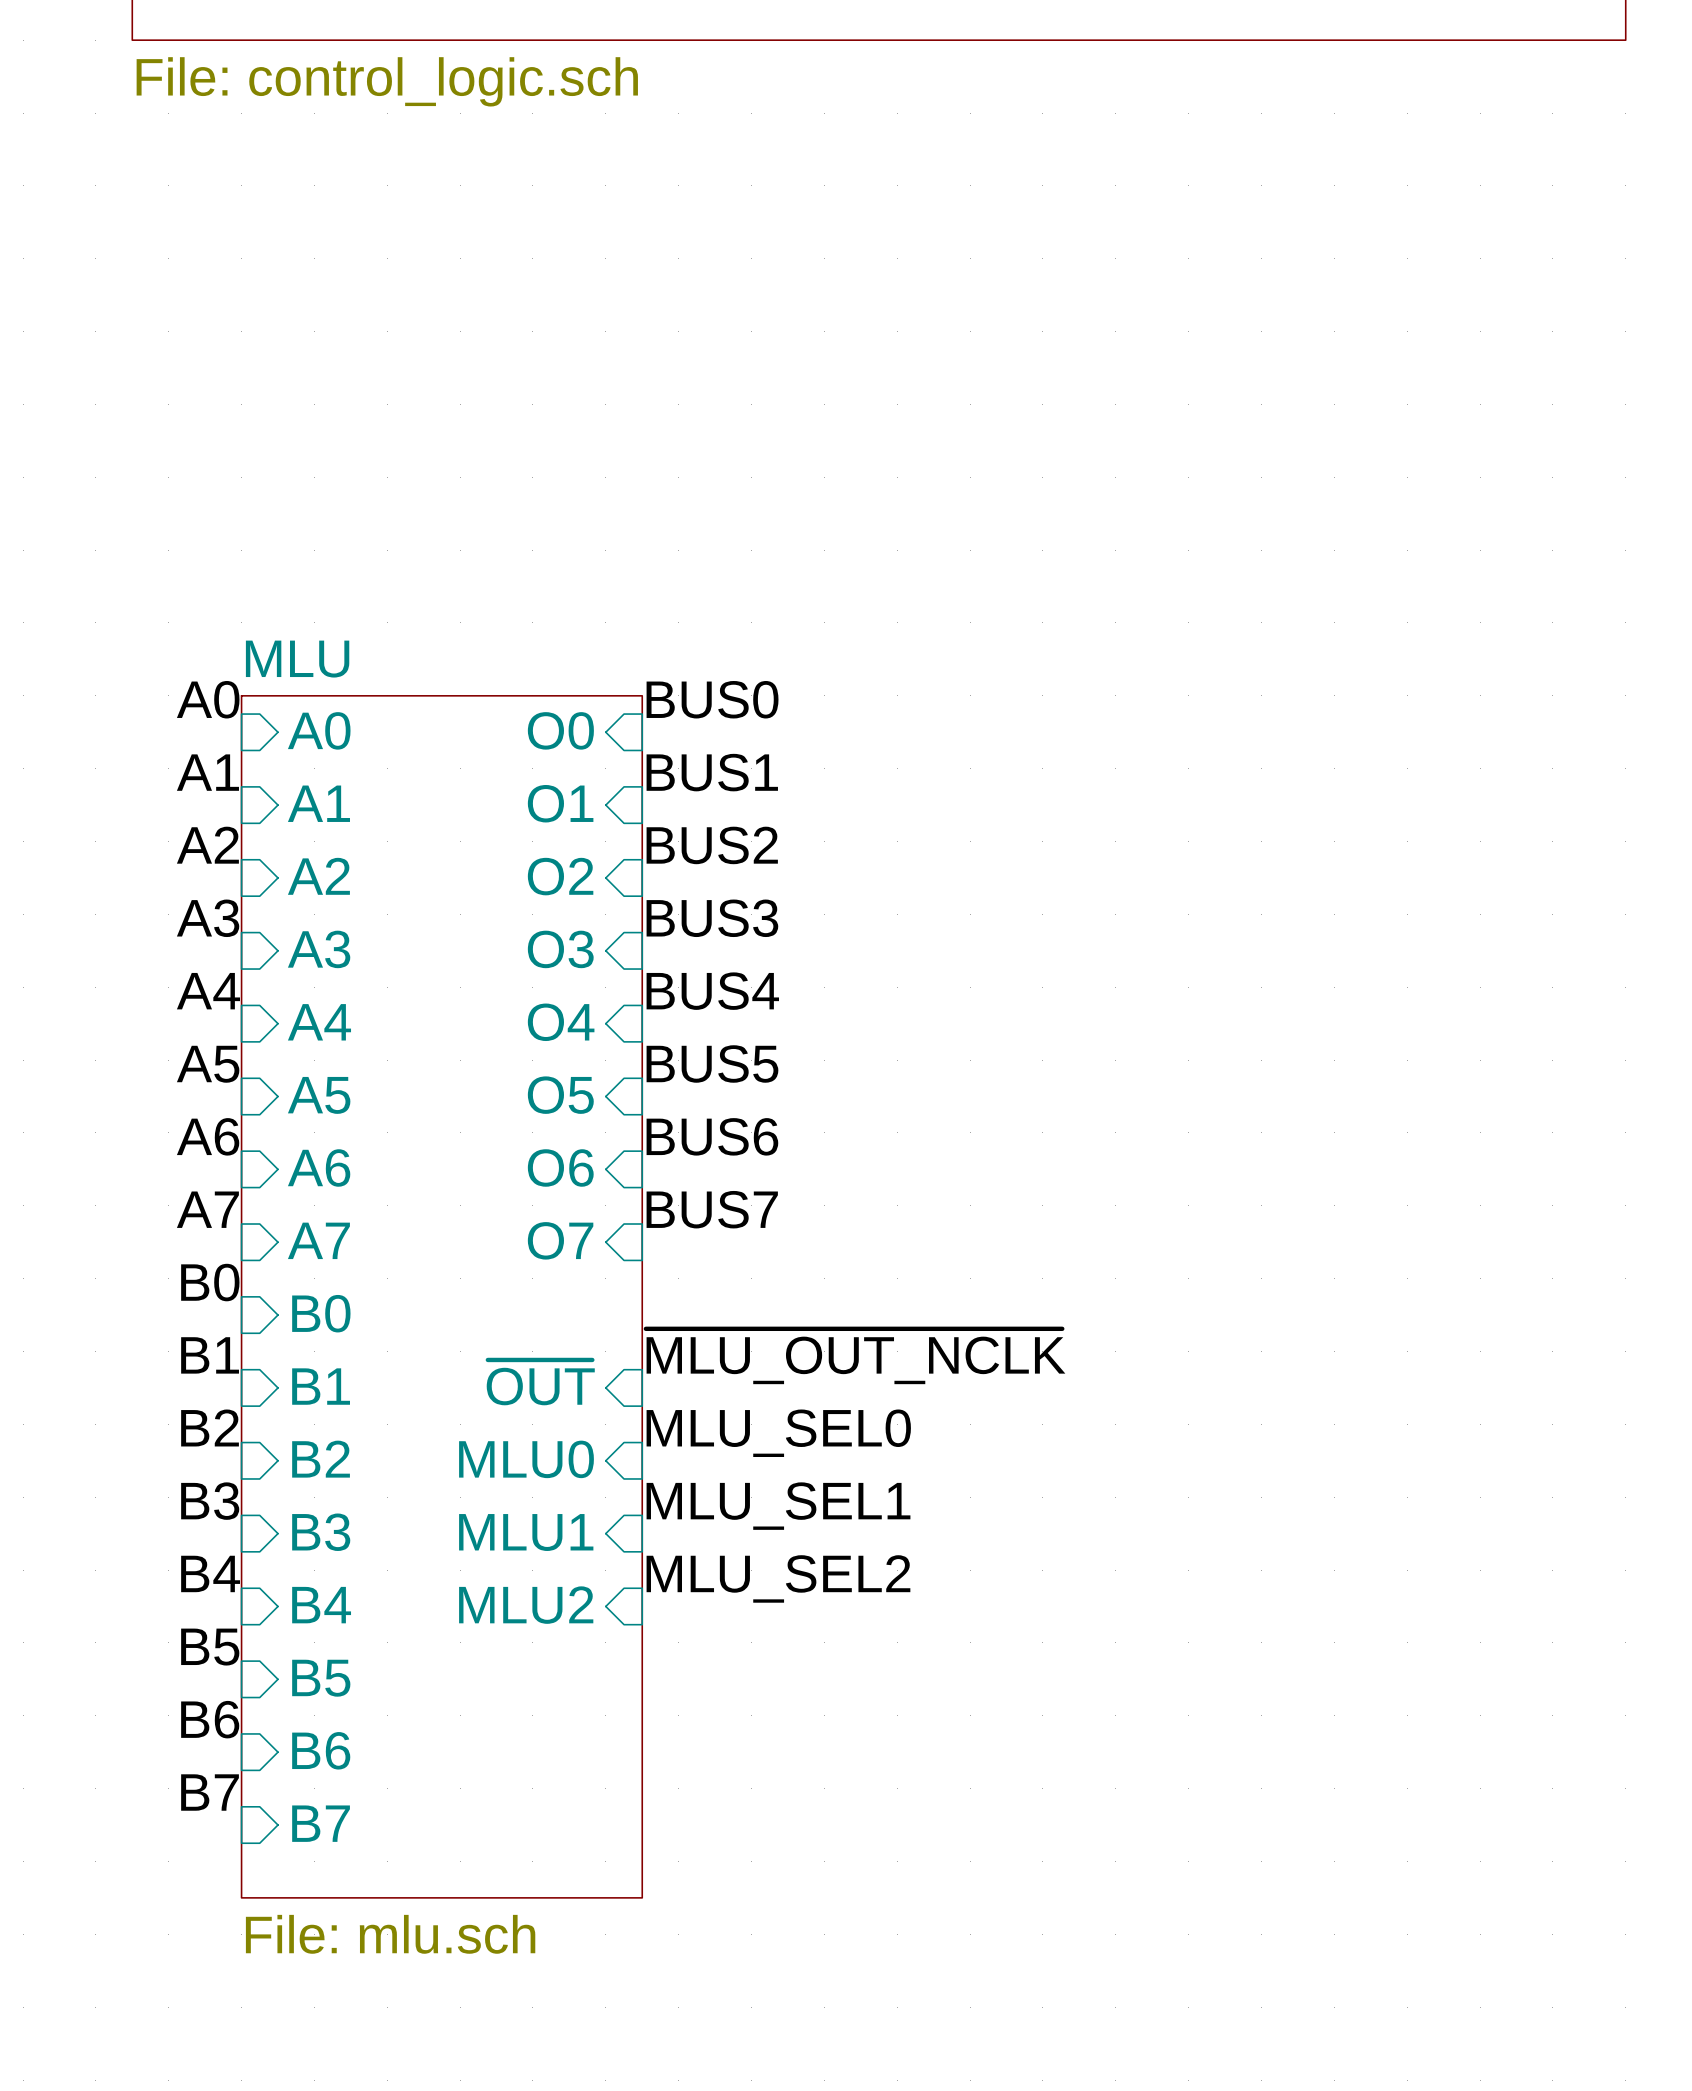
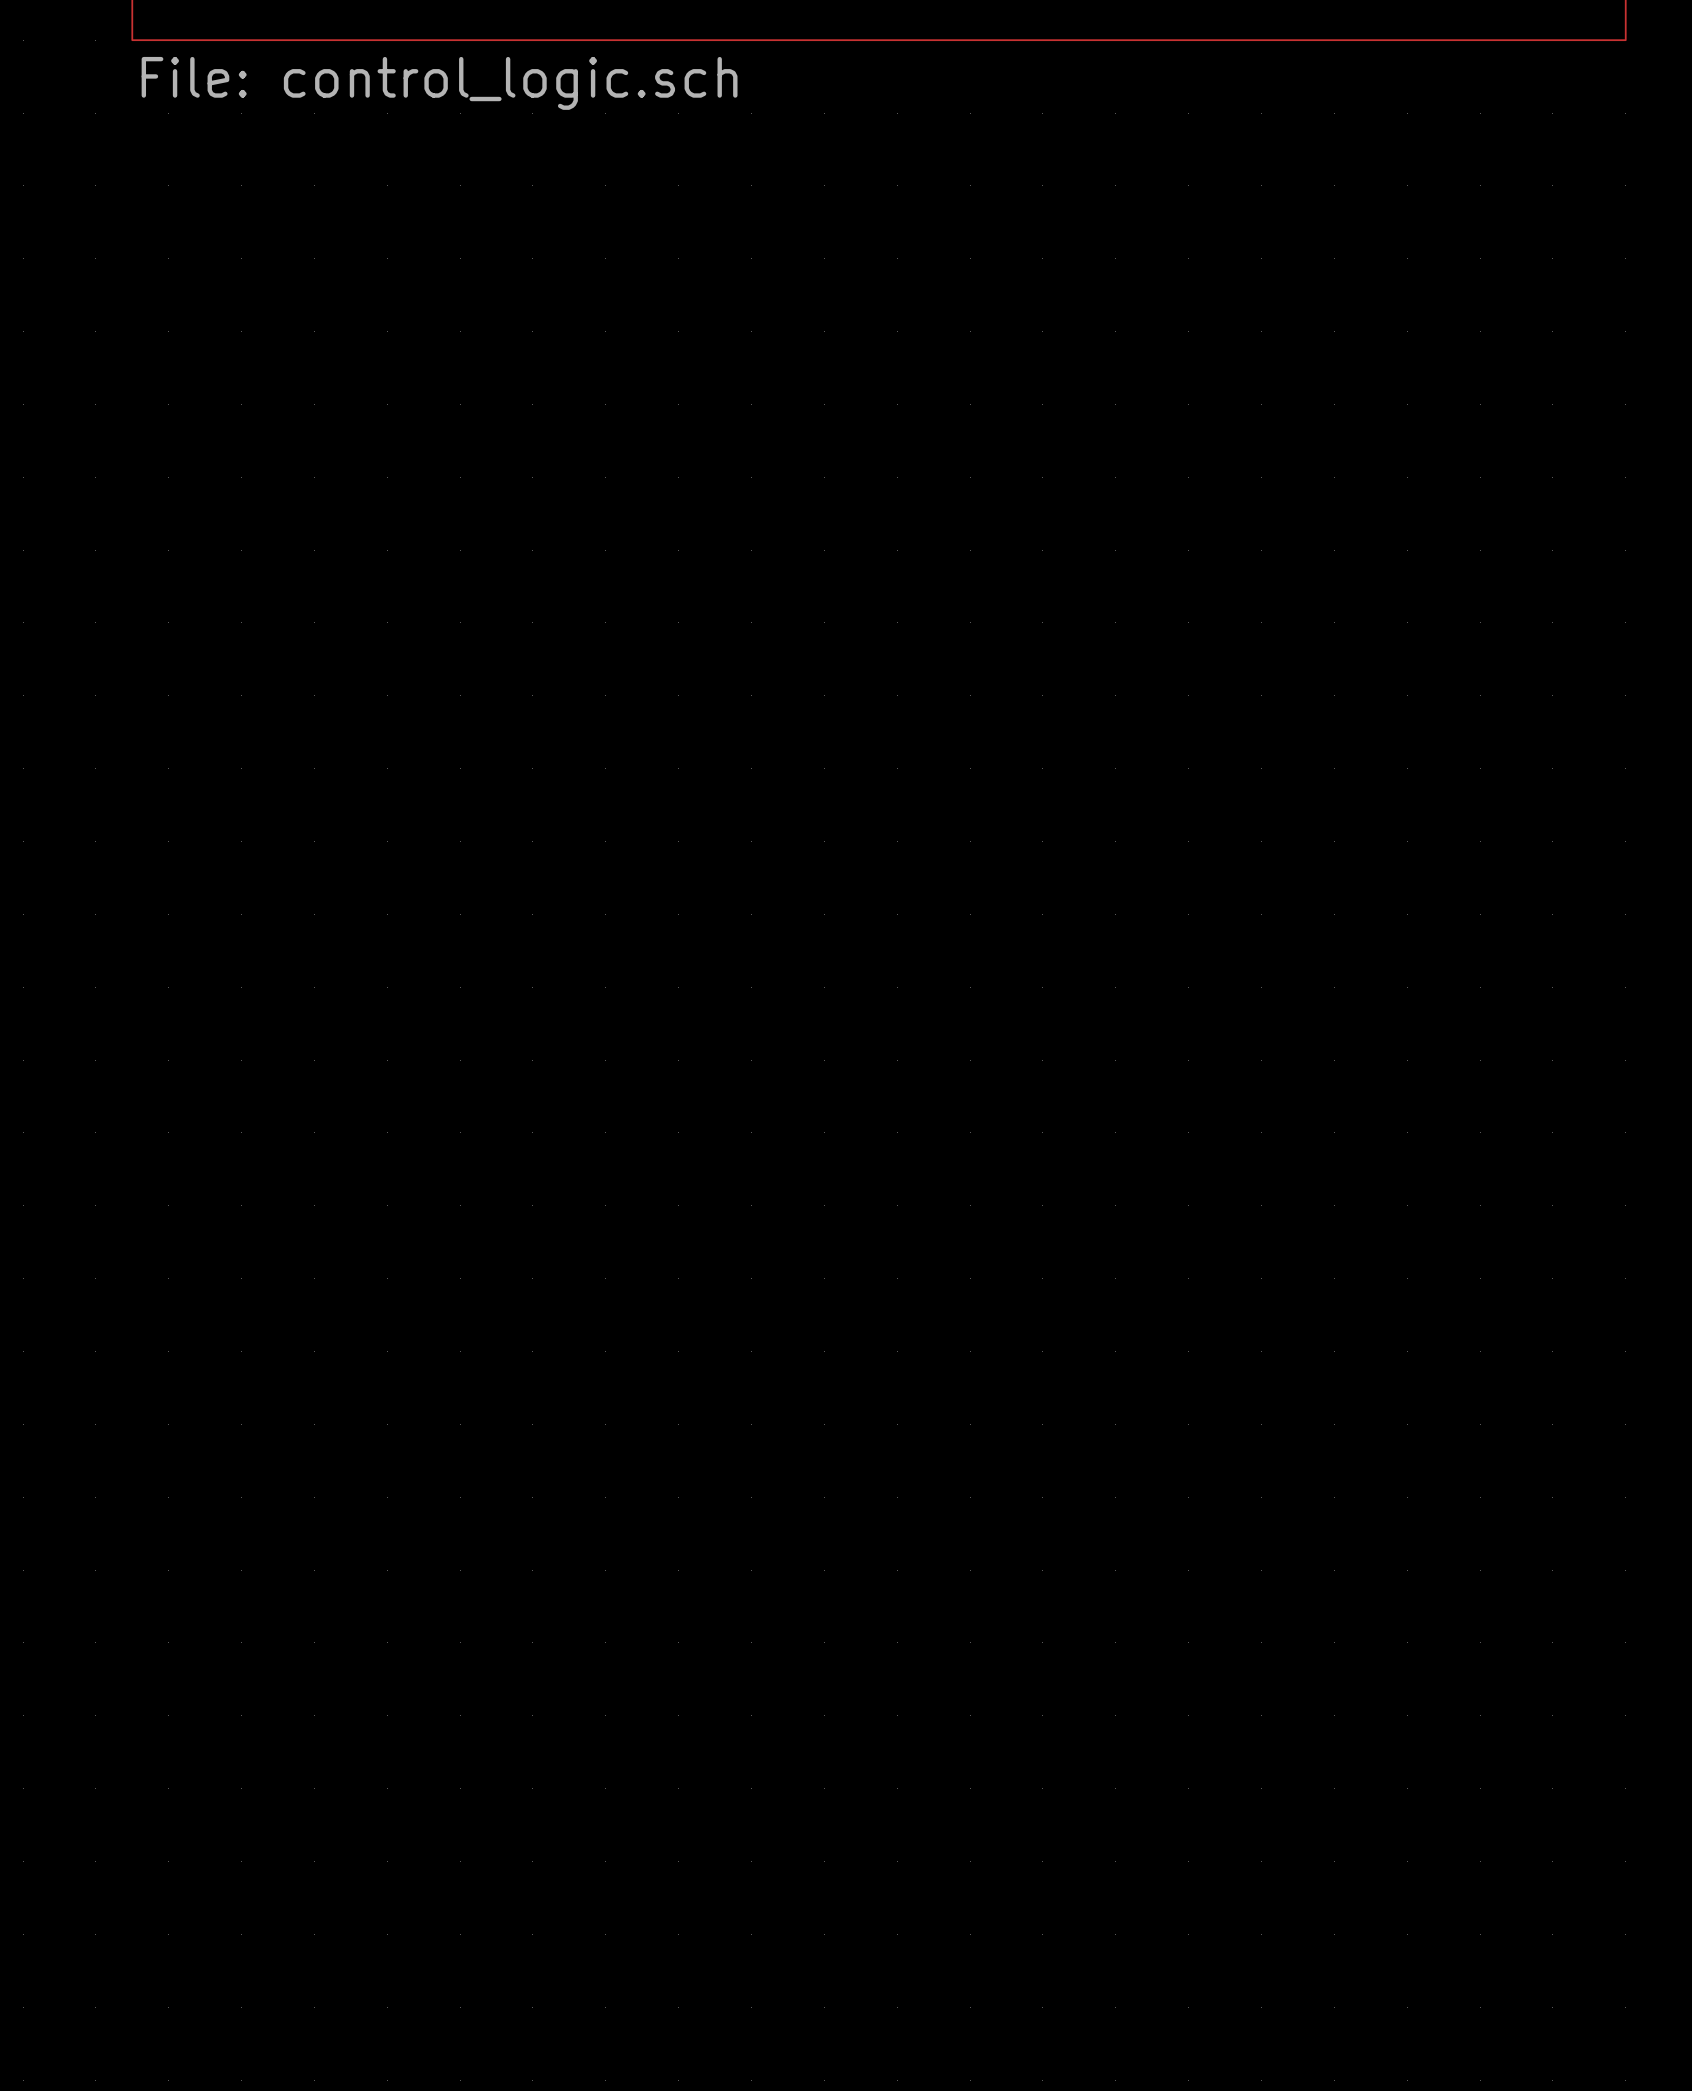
label: A0 (208, 699) -> none
label: BUS0 (712, 699) -> none
sheet pin: A0 (319, 730) -> none
sheet pin: O0 (560, 730) -> none
label: A1 (207, 772) -> none
label: BUS1 (712, 772) -> none
sheet pin: A1 (318, 803) -> none
sheet pin: O1 (560, 803) -> none
label: A2 (207, 845) -> none
label: BUS2 (712, 845) -> none
sheet pin: A2 (318, 876) -> none
sheet pin: O2 (560, 876) -> none
label: A3 (208, 918) -> none
label: BUS3 (712, 918) -> none
sheet pin: A3 (319, 949) -> none
sheet pin: O3 (560, 949) -> none
label: A4 (208, 991) -> none
label: BUS4 (712, 991) -> none
sheet pin: A4 (319, 1022) -> none
sheet pin: O4 (561, 1022) -> none
label: BUS5 (712, 1063) -> none
label: A5 (208, 1064) -> none
sheet pin: A5 (319, 1095) -> none
sheet pin: O5 (560, 1095) -> none
label: A6 (208, 1136) -> none
label: BUS6 (712, 1136) -> none
sheet pin: A6 (319, 1167) -> none
sheet pin: O6 (560, 1167) -> none
label: A7 (207, 1209) -> none
label: BUS7 (712, 1209) -> none
sheet pin: A7 (318, 1240) -> none
sheet pin: O7 (560, 1240) -> none
label: B0 (210, 1282) -> none
sheet MLU: File: mlu.sch (441, 1296) -> none
sheet pin: B0 (321, 1313) -> none
label: B1 (210, 1355) -> none
label: ~{MLU_OUT_NCLK} (855, 1356) -> none
sheet pin: ~{OUT} (540, 1382) -> none
sheet pin: B1 (321, 1386) -> none
label: B2 (210, 1427) -> none
label: MLU_SEL0 (778, 1433) -> none
sheet pin: B2 (321, 1459) -> none
sheet pin: MLU0 (526, 1459) -> none
label: B3 (210, 1501) -> none
label: MLU_SEL1 (778, 1506) -> none
sheet pin: B3 (321, 1532) -> none
sheet pin: MLU1 (526, 1532) -> none
label: B4 (210, 1573) -> none
label: MLU_SEL2 (778, 1578) -> none
sheet pin: B4 (321, 1605) -> none
sheet pin: MLU2 (526, 1605) -> none
label: B5 (210, 1647) -> none
sheet pin: B5 (321, 1678) -> none
label: B6 (210, 1719) -> none
sheet pin: B6 (321, 1750) -> none
label: B7 (210, 1792) -> none
sheet pin: B7 (321, 1823) -> none

